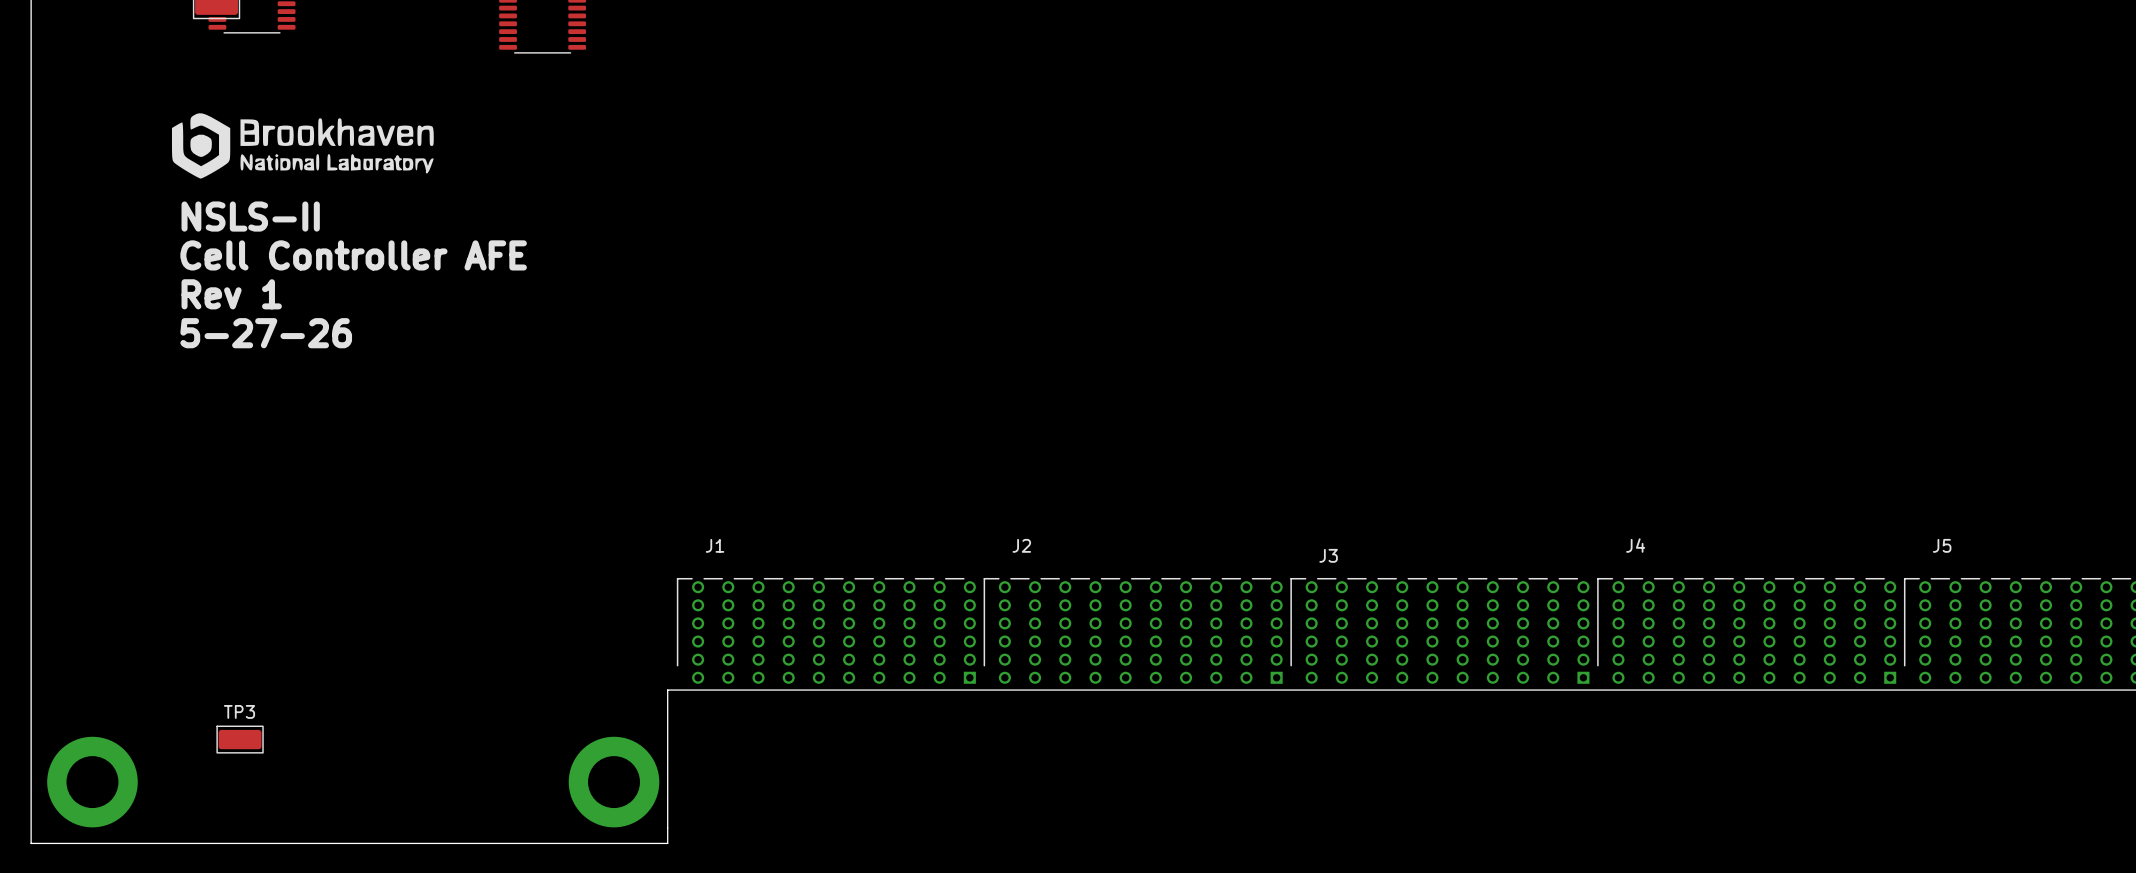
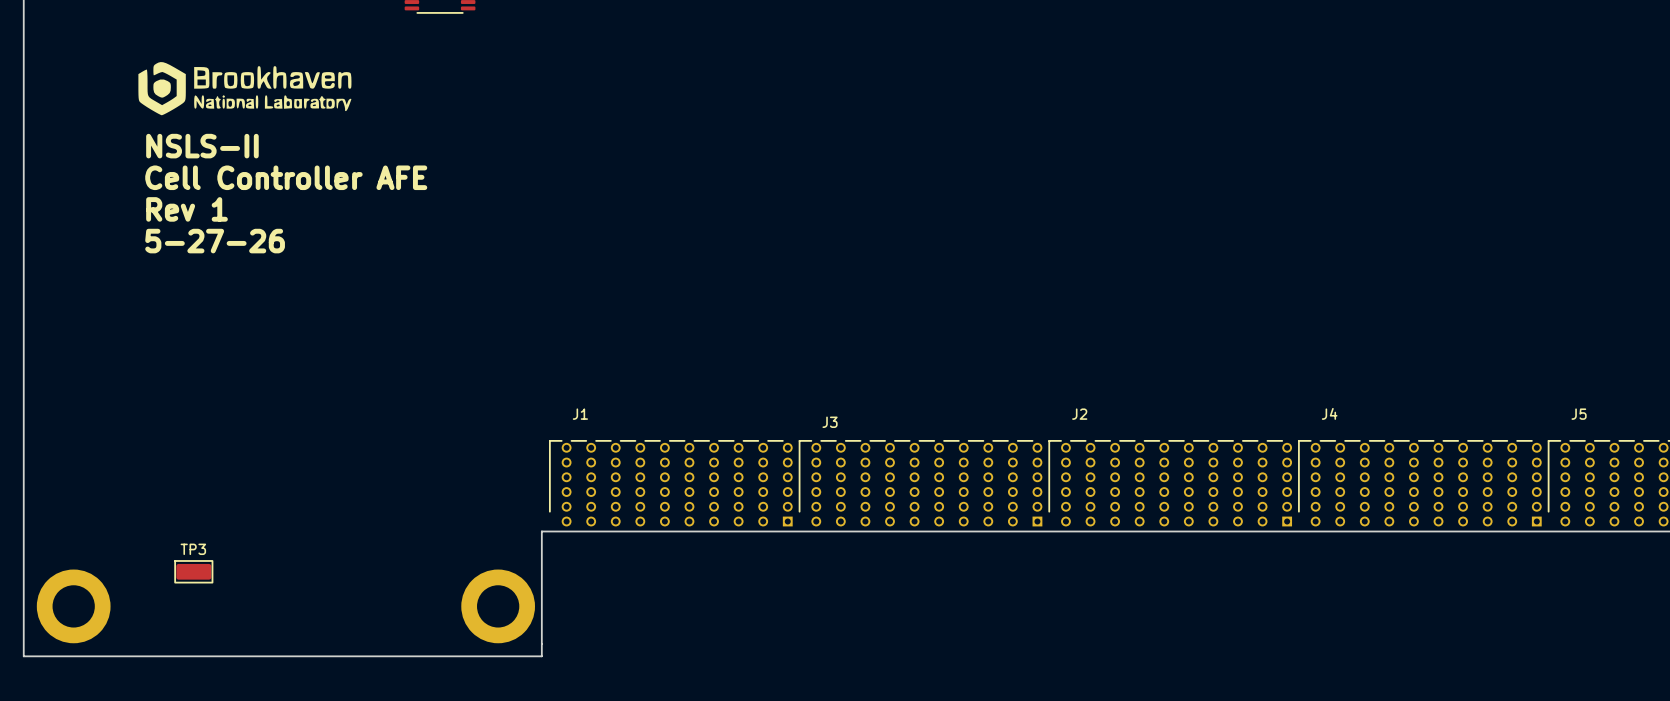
J2 name: J2 (1021, 545) -> J3 (830, 422)
J3 name: J3 (1328, 555) -> J2 (1079, 414)

